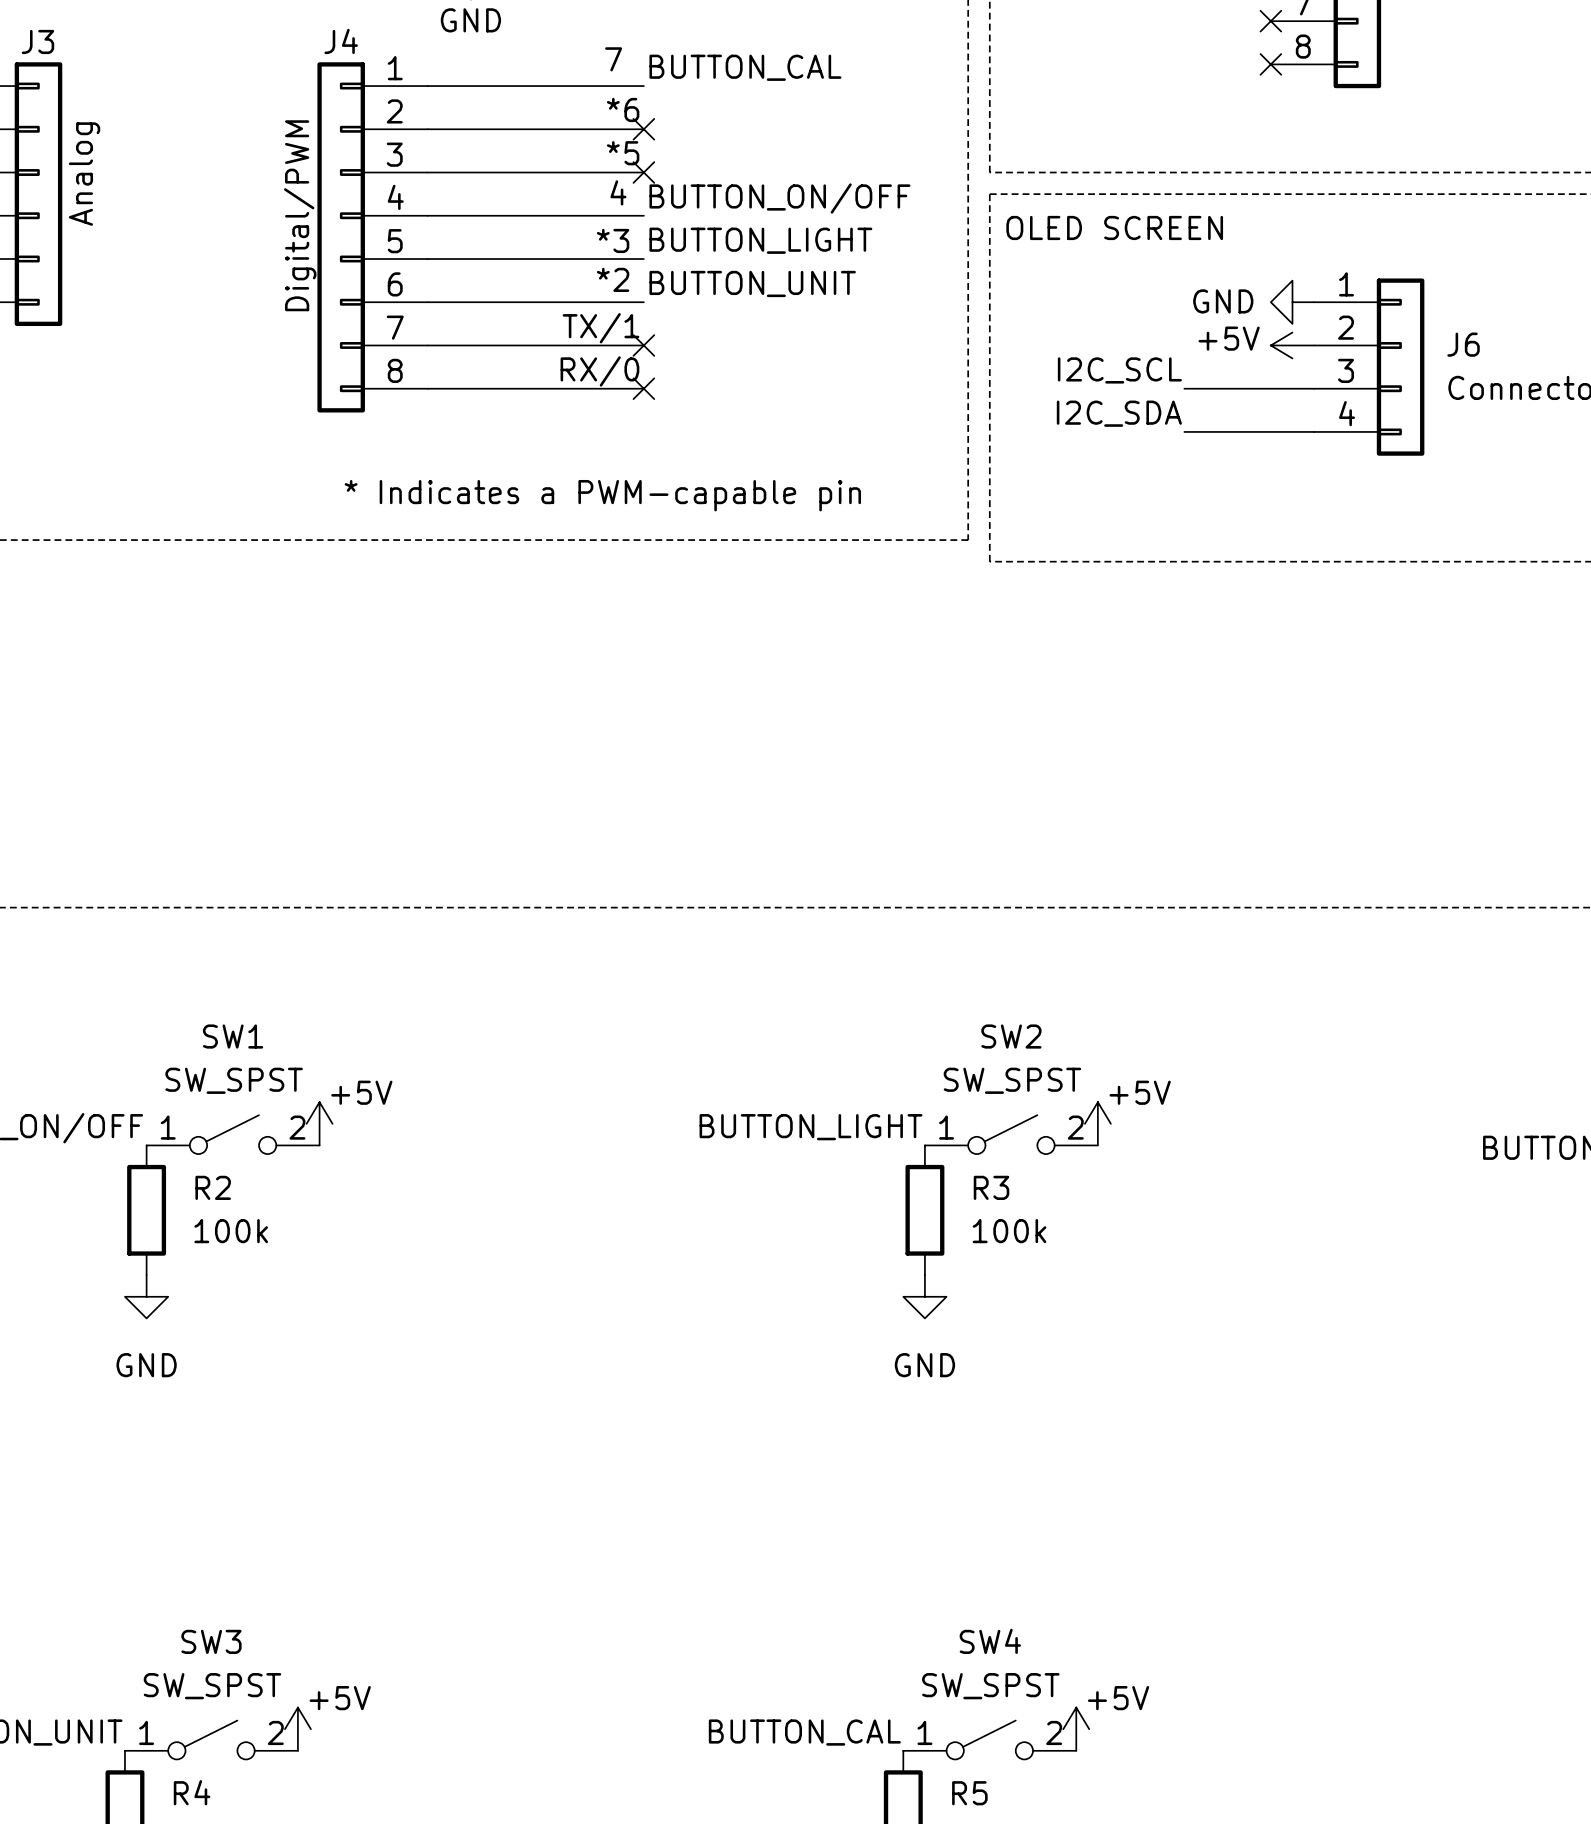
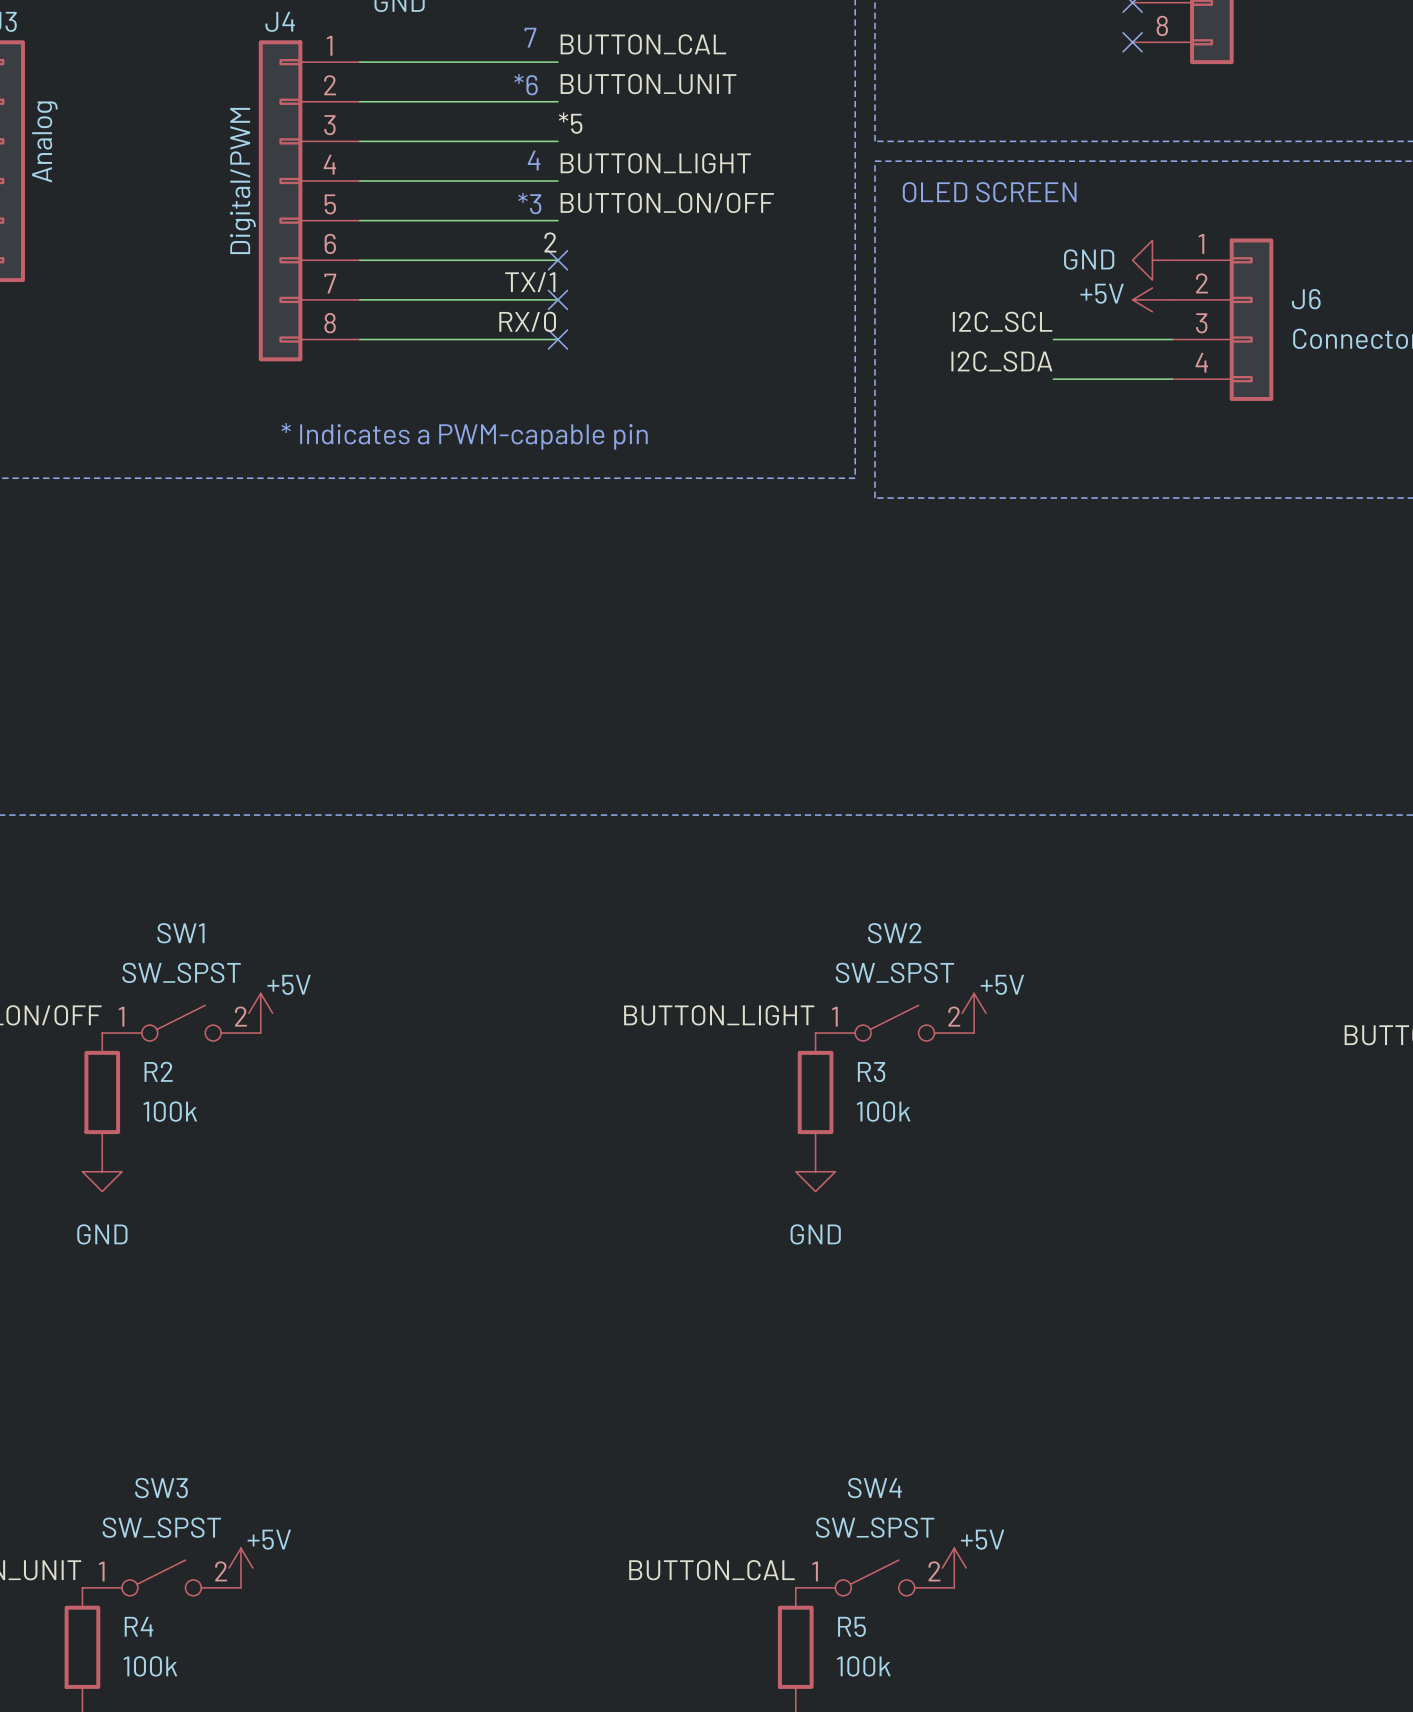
label: *6 (623, 109) -> BUTTON_UNIT (648, 84)
text: none -> *6 (526, 84)
no-connect mark: (643, 129) -> none
label position: *5 (623, 153) -> *5 (570, 123)
no-connect mark: (643, 172) -> none
label: BUTTON_ON/OFF (779, 198) -> BUTTON_LIGHT (655, 163)
label: BUTTON_LIGHT (760, 240) -> BUTTON_ON/OFF (667, 202)
text: *2 (613, 279) -> none
label: BUTTON_UNIT (752, 283) -> 2 (550, 242)
no-connect mark: none -> (557, 260)

